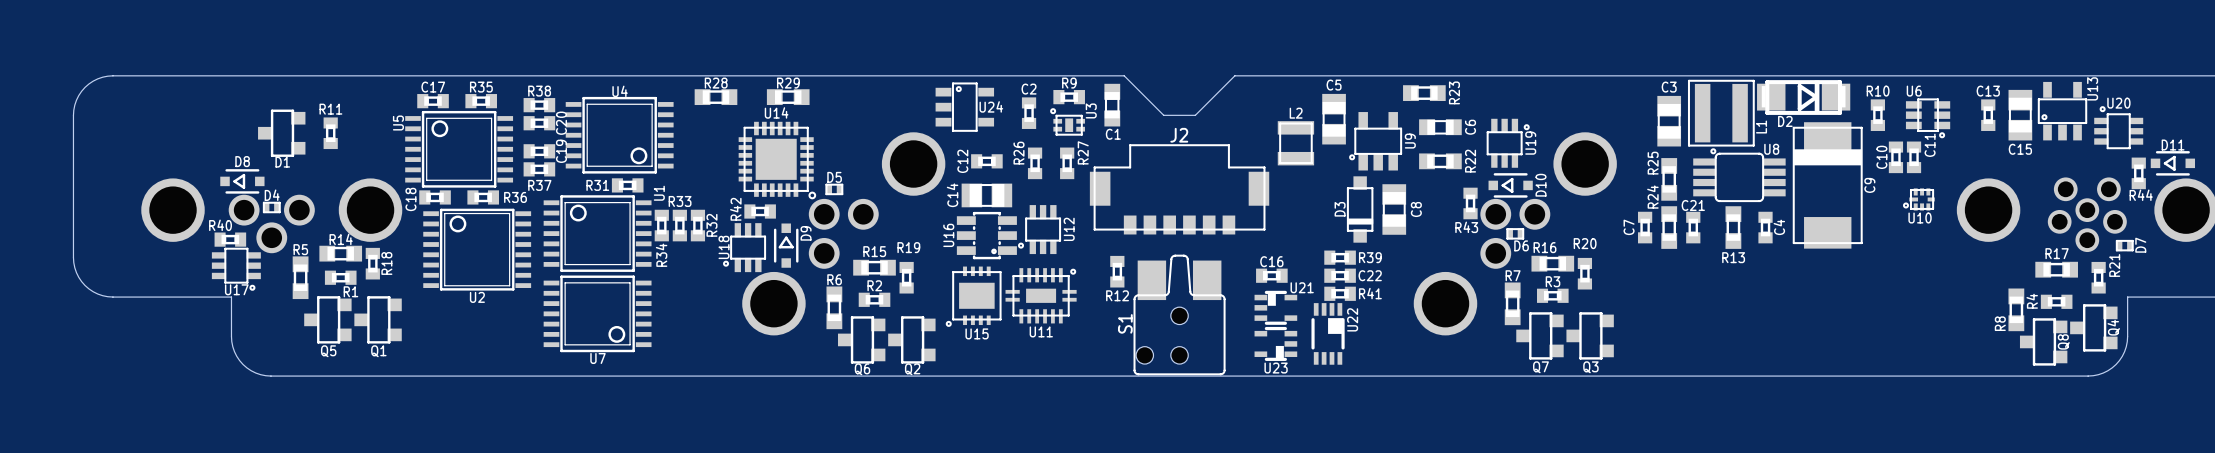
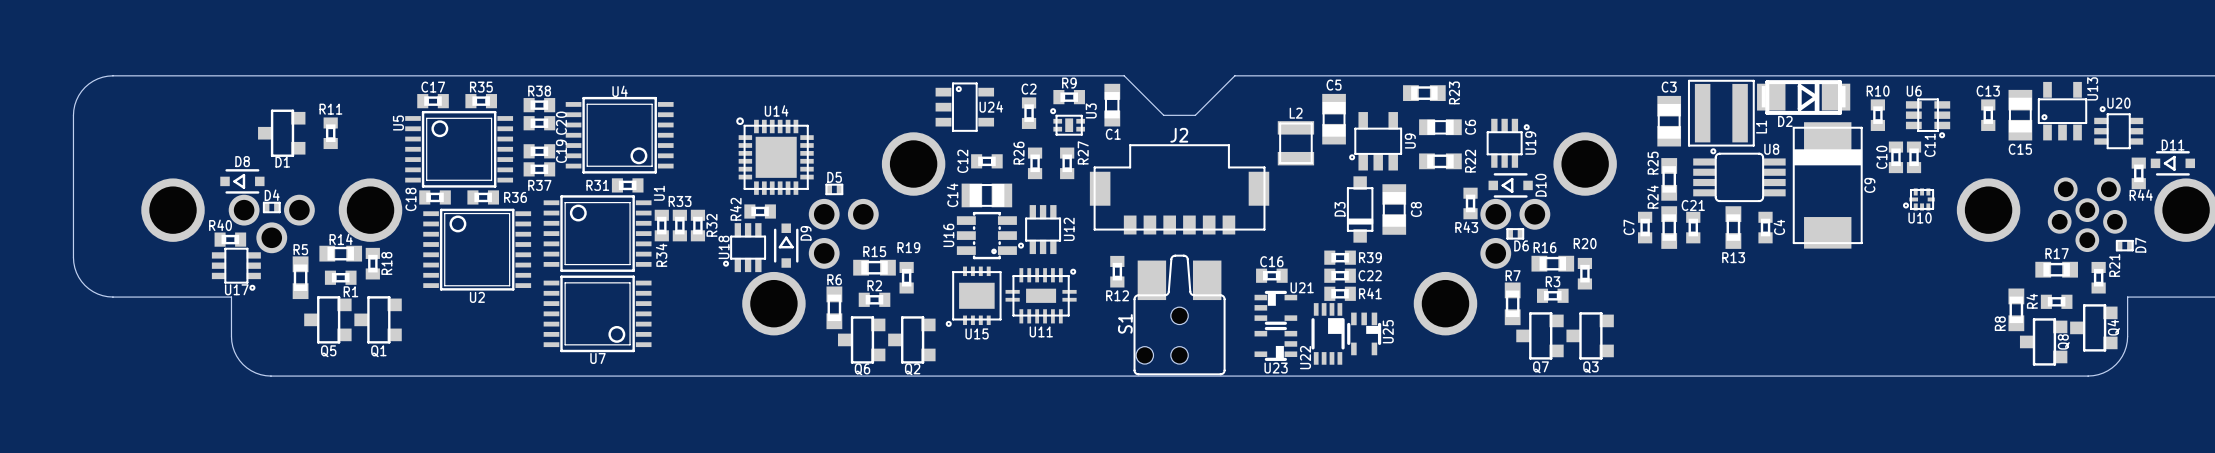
R28: (715, 97) -> none
R29: (788, 97) -> none
U14 rotation: 0° (777, 160) -> 180° (774, 156)
U22 name position: U22 (1352, 319) -> U22 (1305, 357)
U25: none -> (1364, 333)

